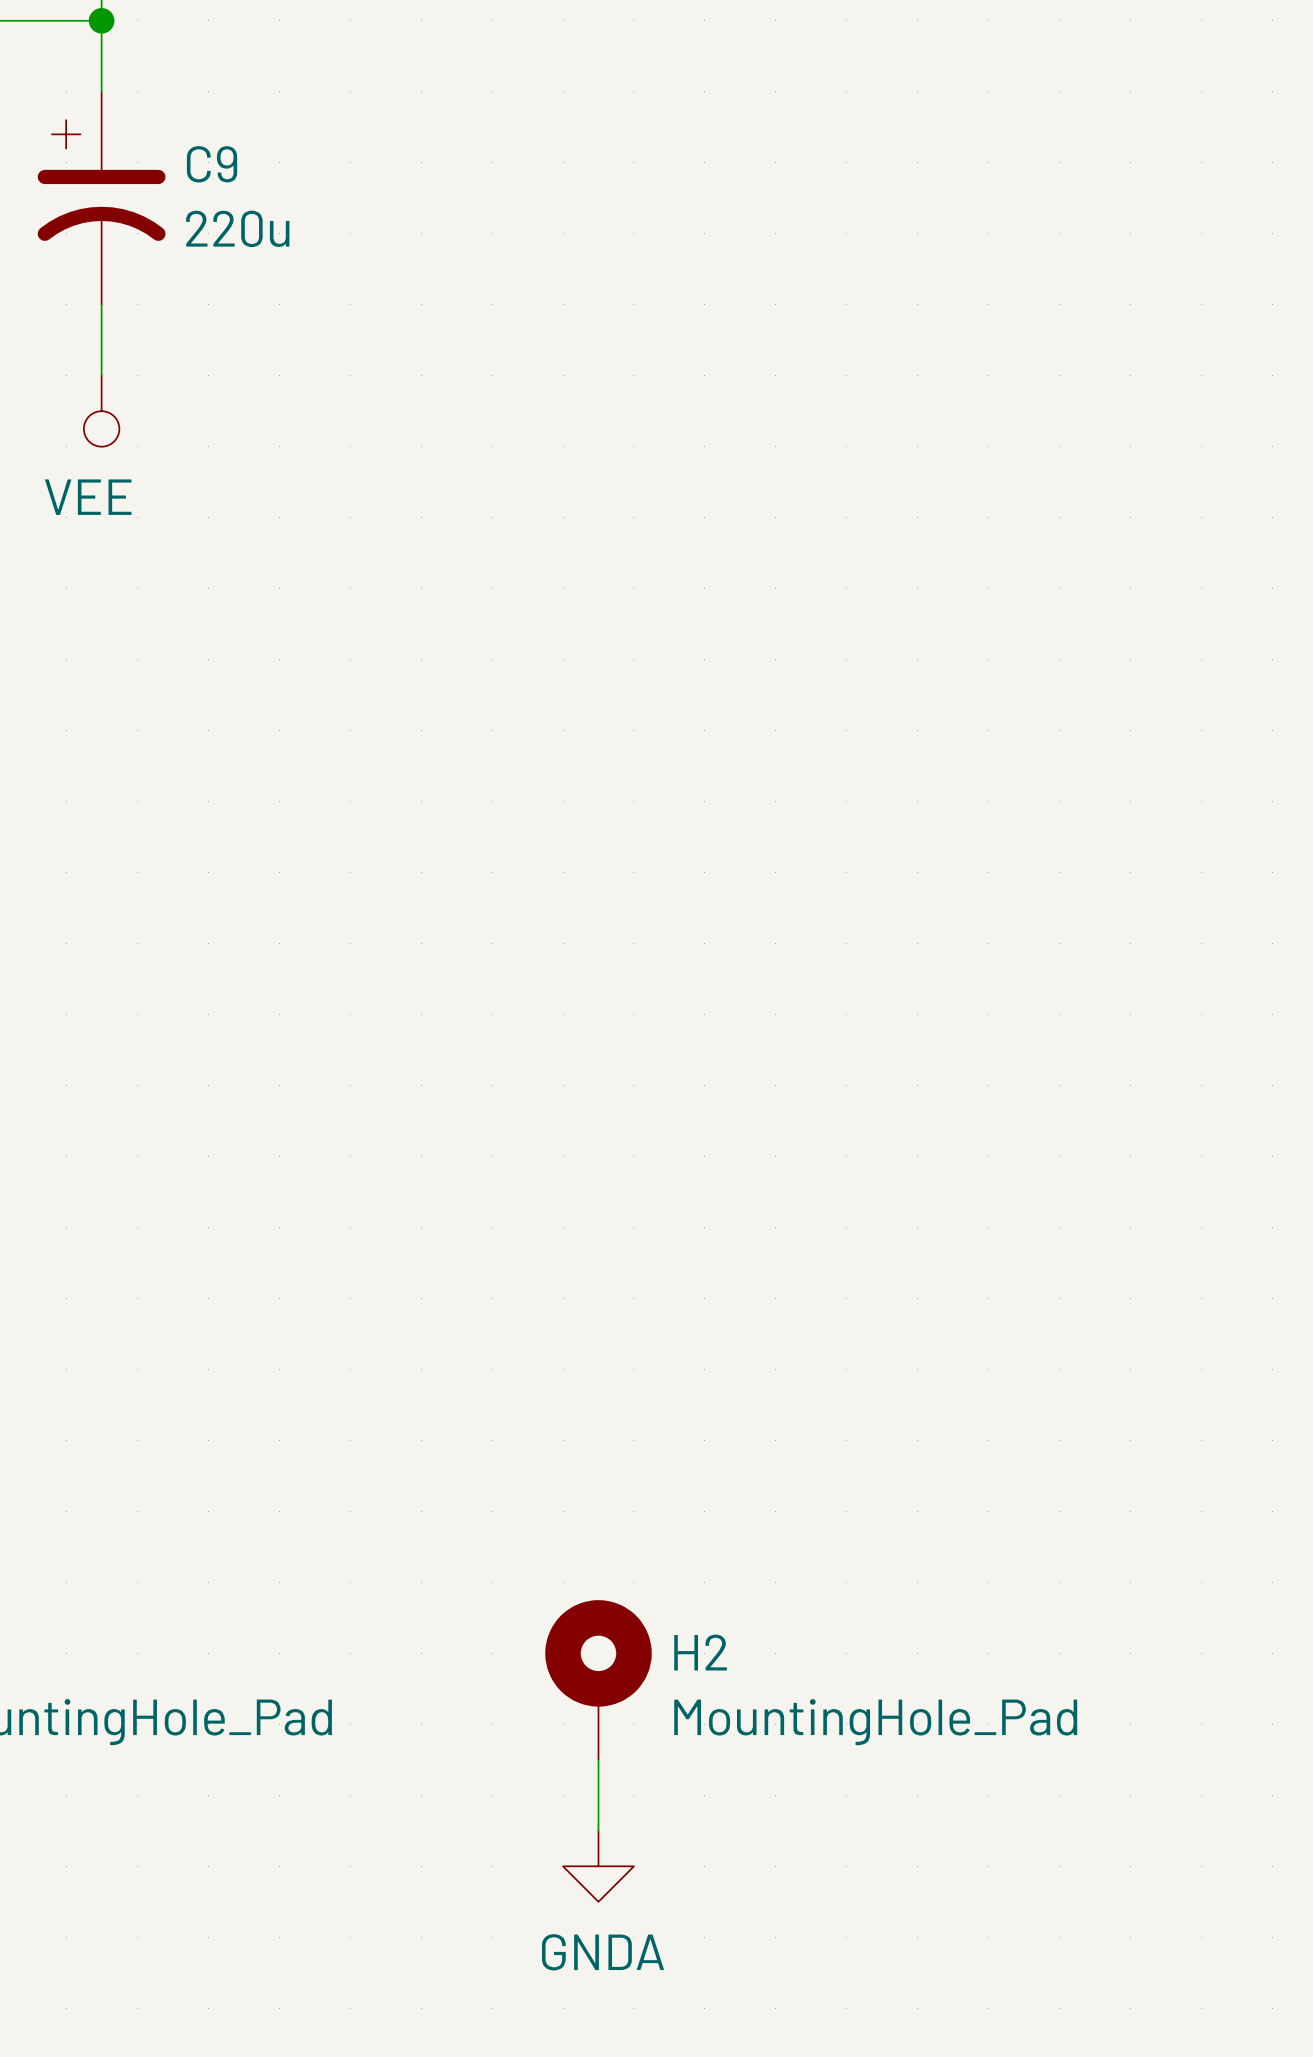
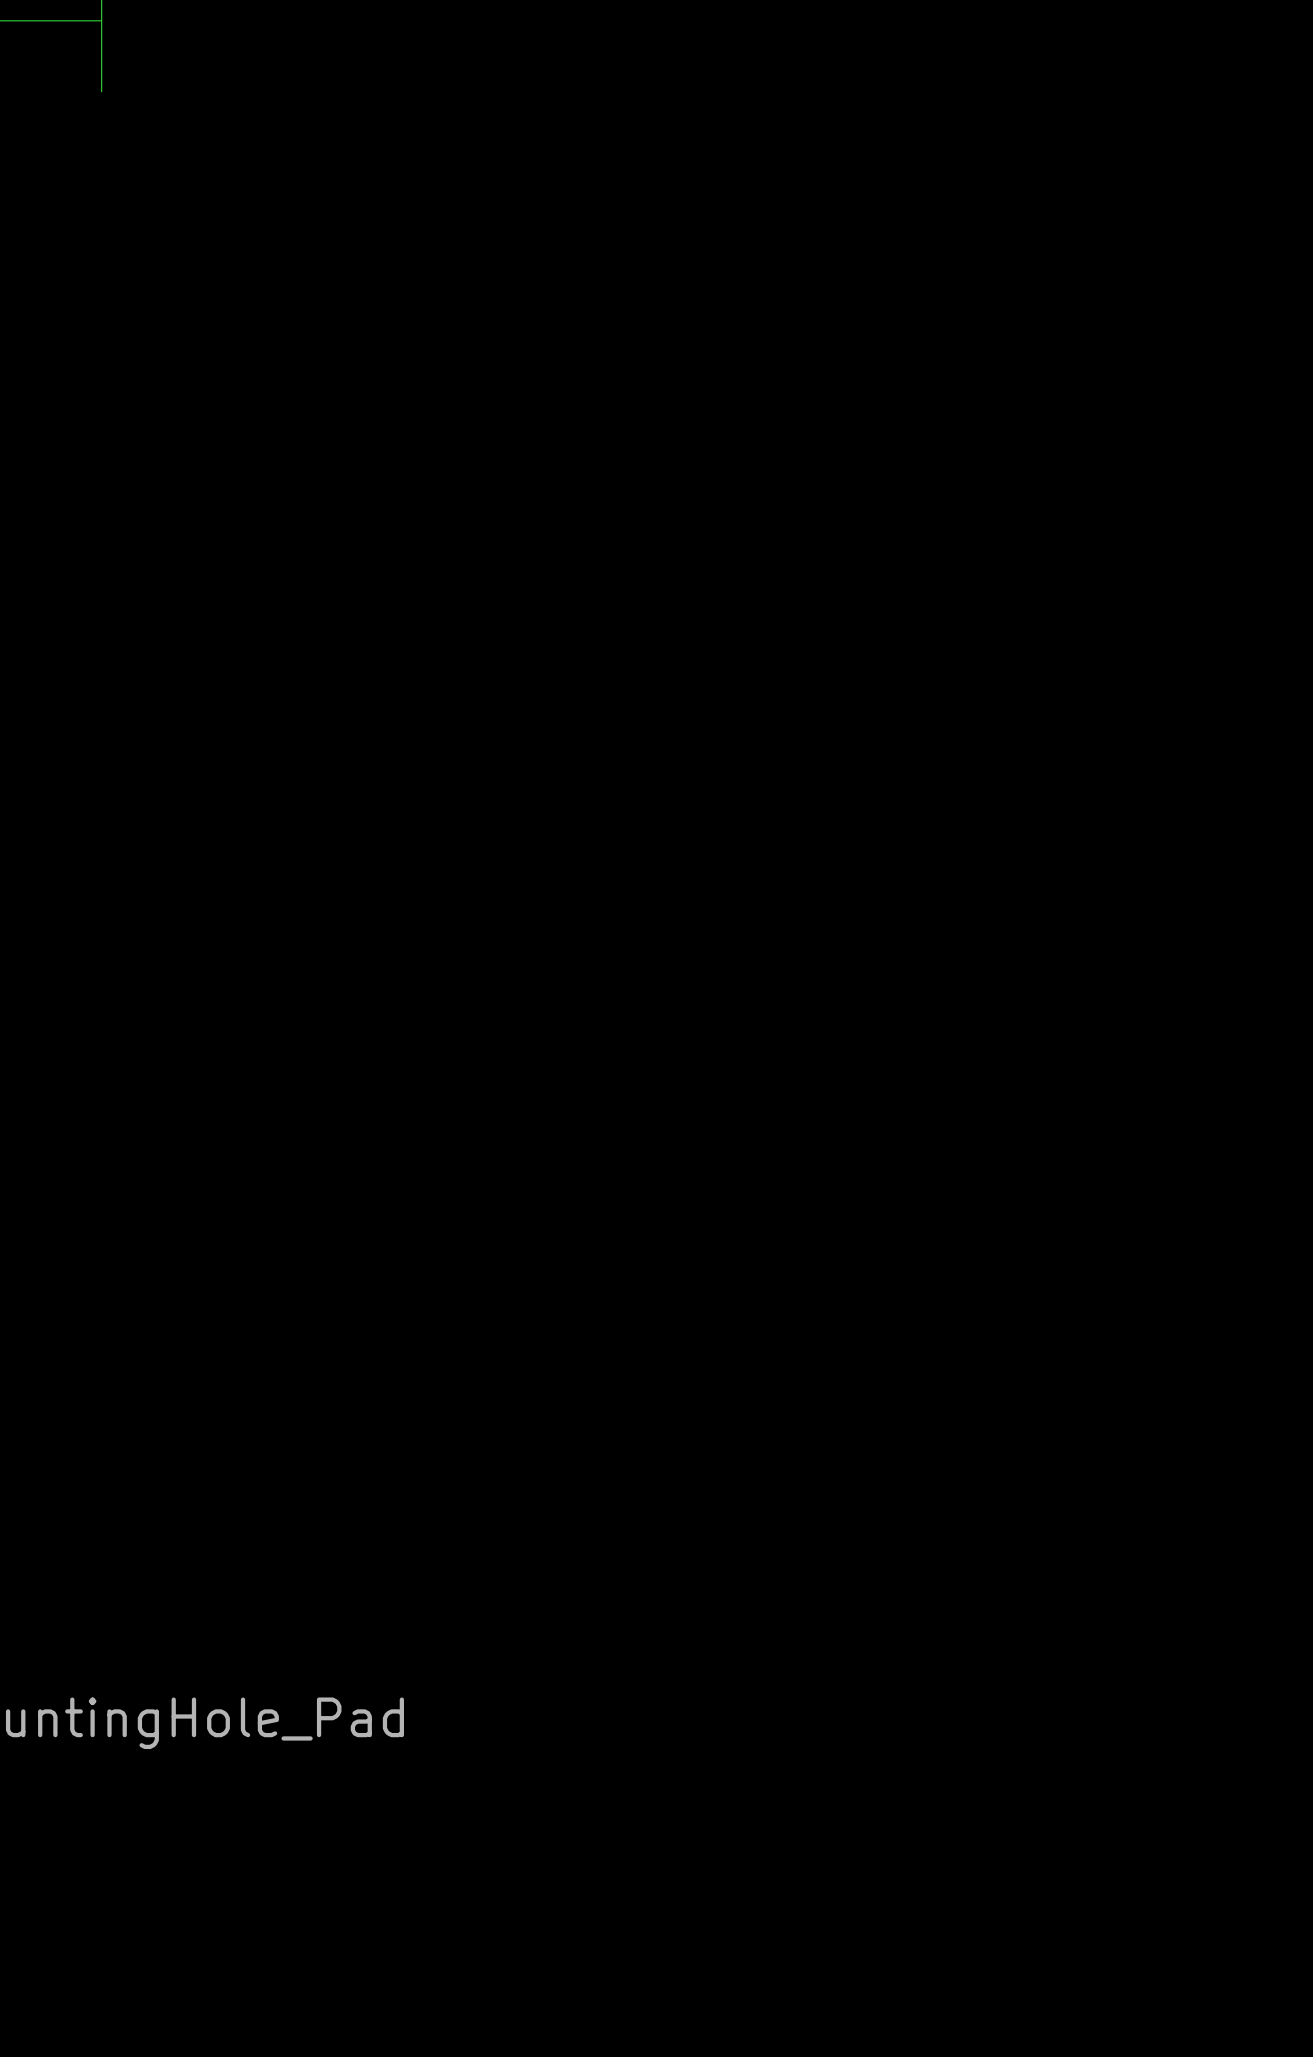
junction: (101, 20) -> none
C9: 220u (101, 198) -> none
wire: (101, 304) (101, 375) -> none
power symbol: VEE (101, 411) -> none
H2: MountingHole_Pad (598, 1679) -> none
wire: (598, 1759) (598, 1830) -> none
power symbol: GNDA (598, 1866) -> none

